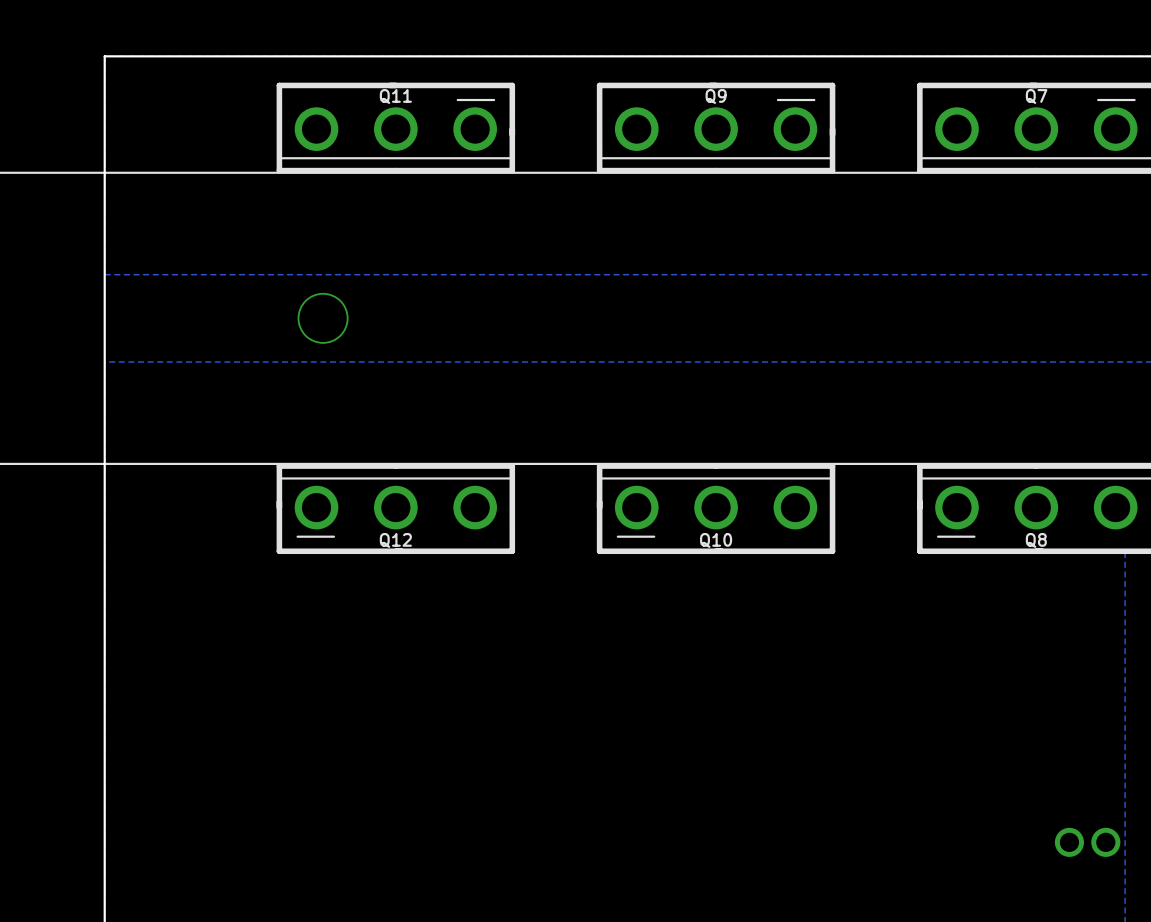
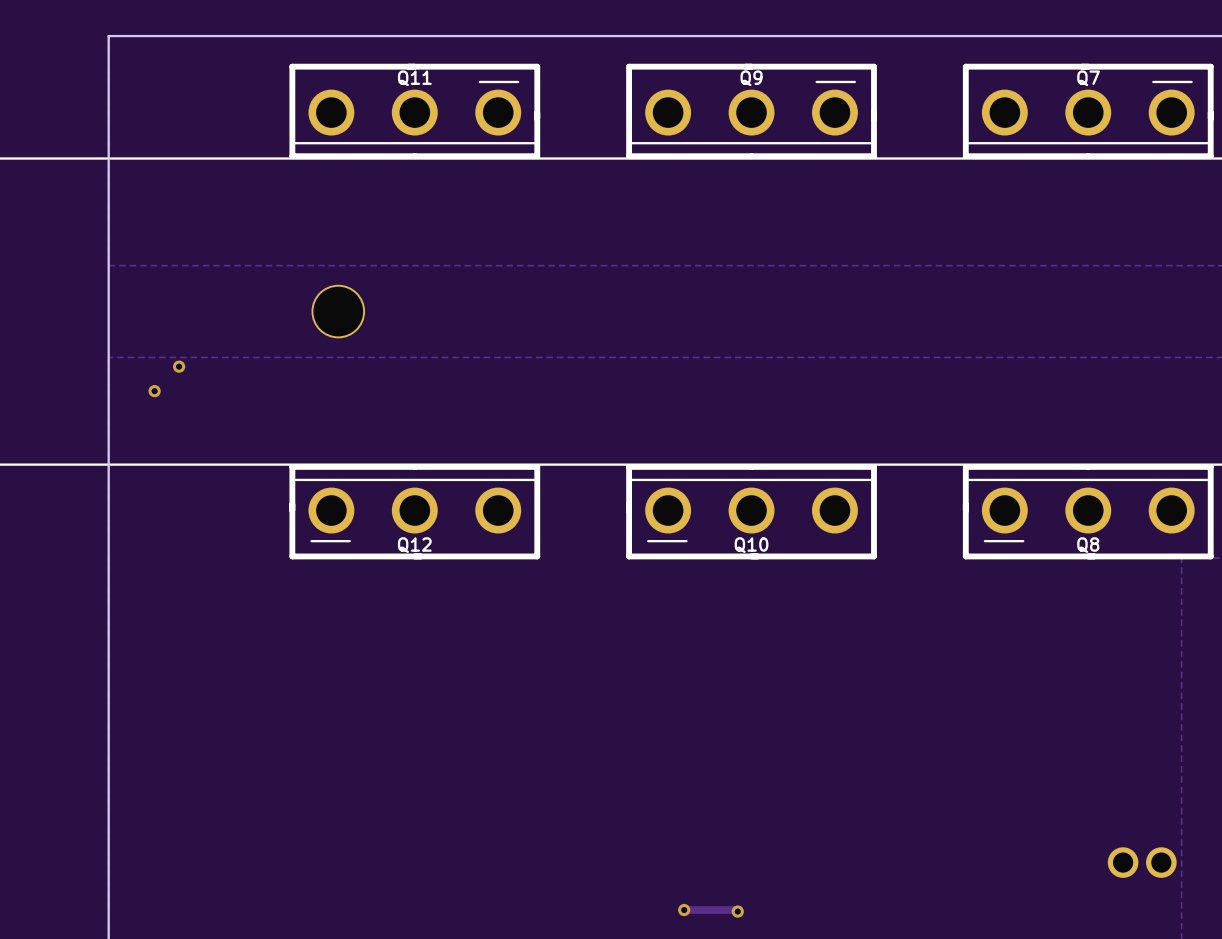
via: none -> (179, 366)
via: none -> (154, 391)
track: none -> (684, 910) (737, 911)
via: none -> (684, 910)
via: none -> (737, 911)

